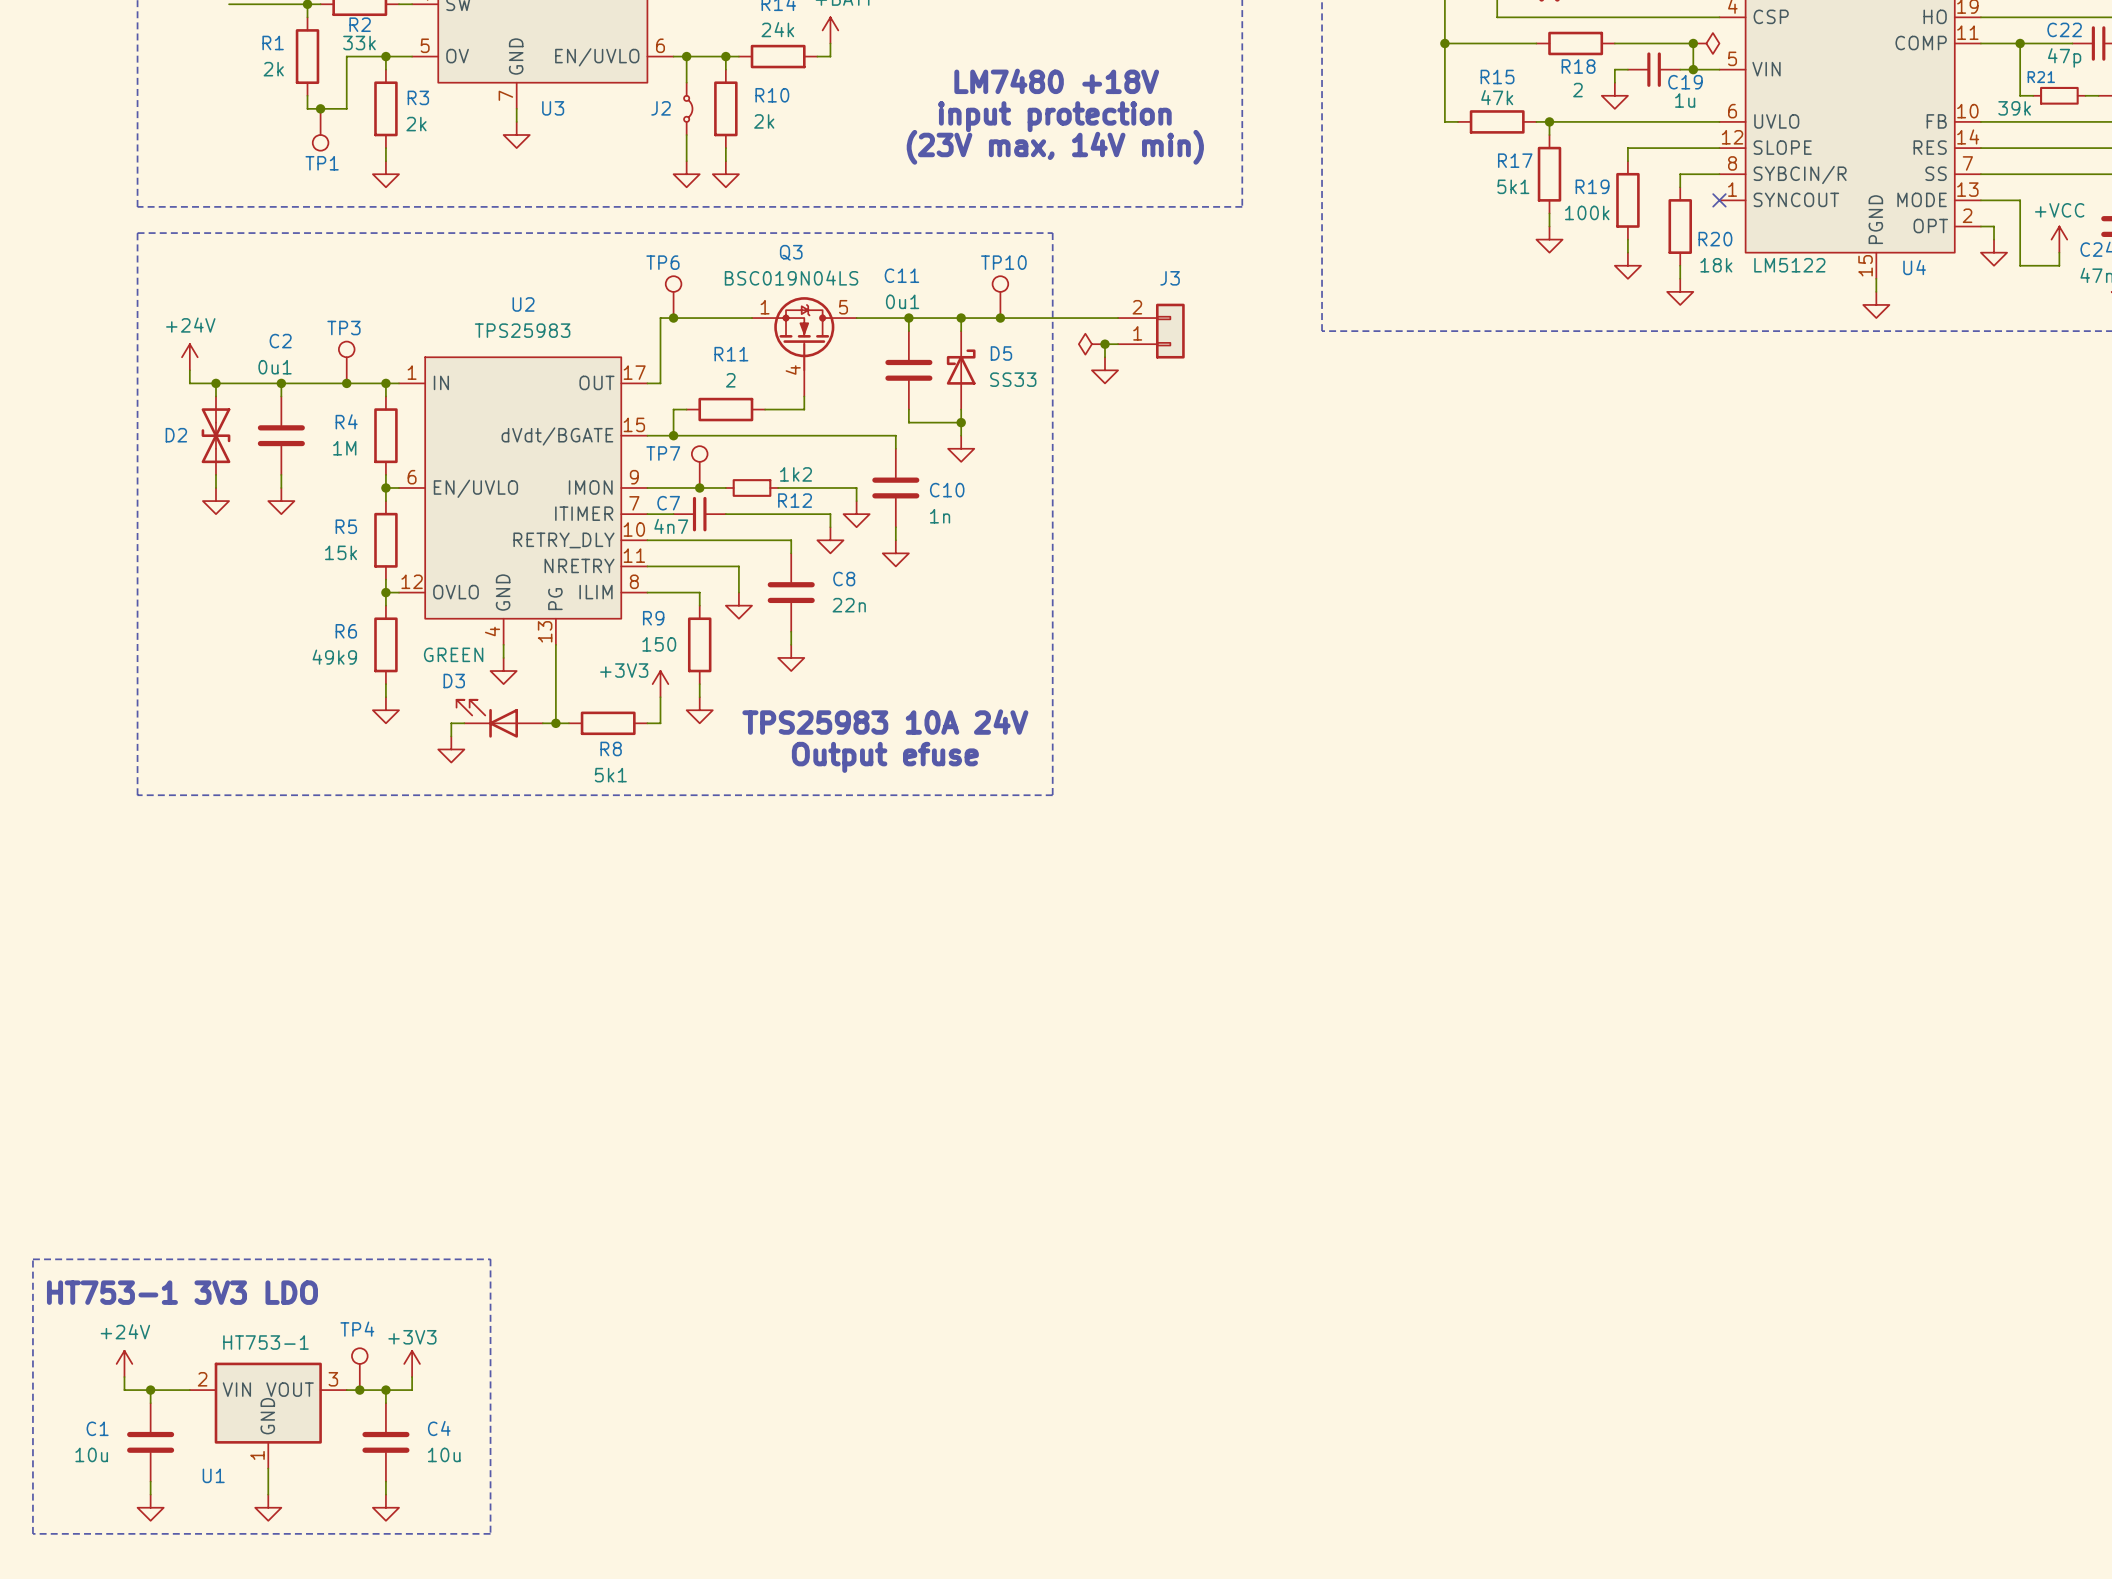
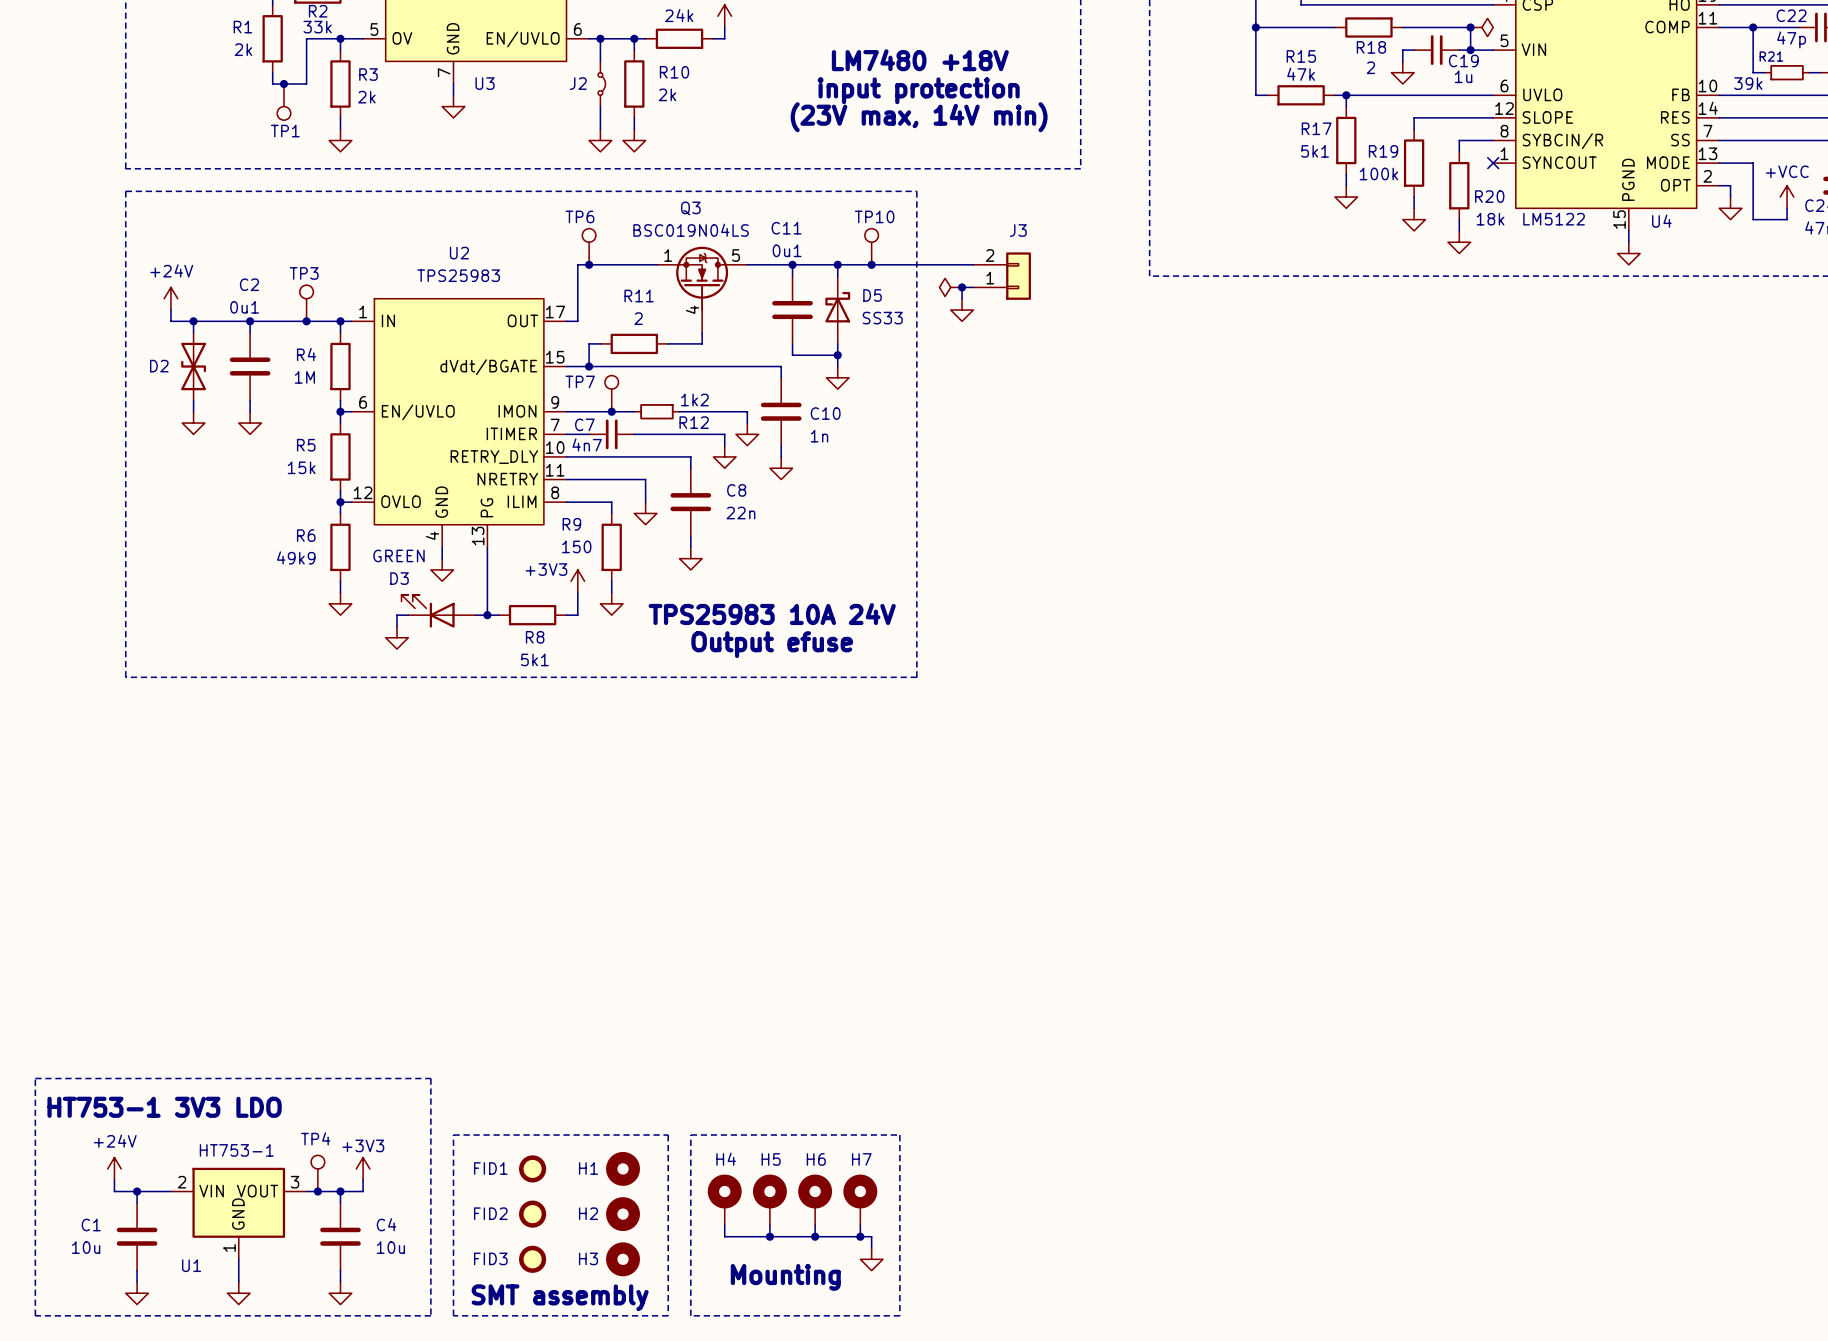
line: none -> (453, 1135) (668, 1135) (668, 1315) (453, 1315) (453, 1135)
line: none -> (690, 1135) (899, 1135) (899, 1315) (690, 1315) (690, 1135)
FID1: none -> (532, 1168)
H1: none -> (623, 1168)
H4: none -> (724, 1199)
H5: none -> (769, 1199)
H6: none -> (815, 1199)
H7: none -> (860, 1199)
FID2: none -> (532, 1214)
H2: none -> (623, 1214)
wire: none -> (724, 1225) (724, 1236) (871, 1236) (871, 1248)
wire: none -> (769, 1225) (769, 1236)
wire: none -> (815, 1225) (815, 1236)
wire: none -> (860, 1225) (860, 1236)
junction: none -> (769, 1236)
junction: none -> (815, 1236)
junction: none -> (860, 1236)
FID3: none -> (532, 1259)
H3: none -> (623, 1259)
power symbol: none -> (871, 1259)
text: none -> Mounting (785, 1277)
text: none -> SMT assembly (560, 1297)

